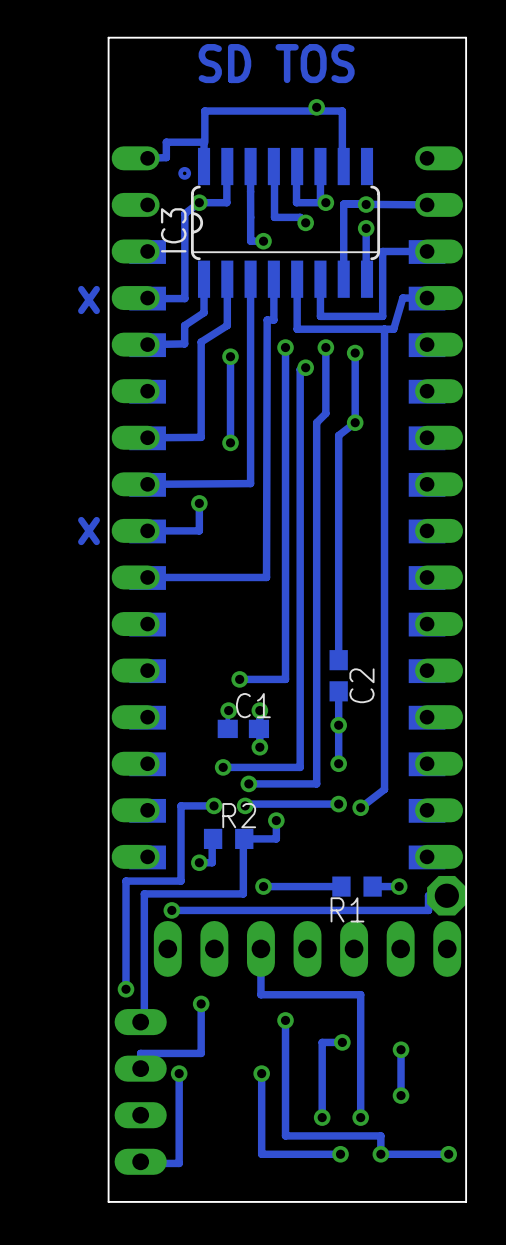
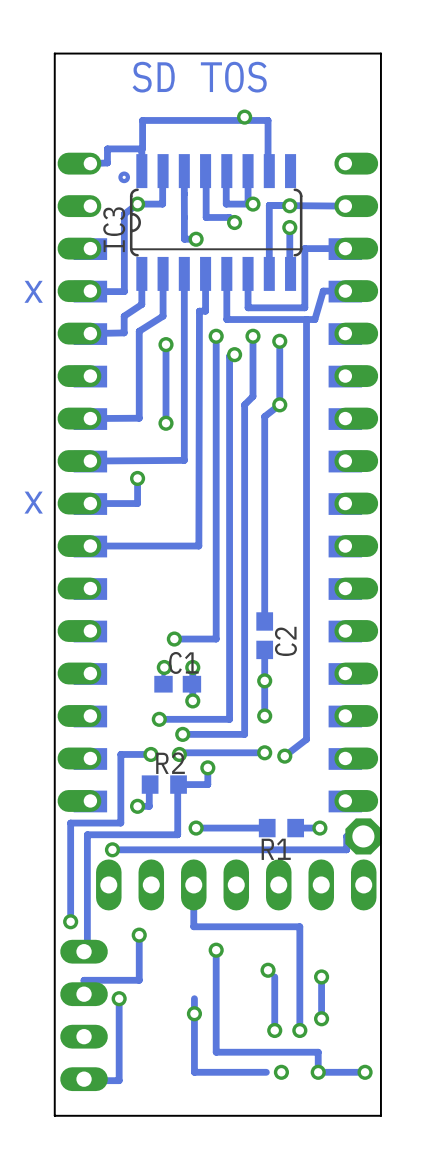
track: (360, 994) (360, 1117) -> (284, 926) (299, 926) (299, 1030)
track: (342, 1042) (322, 1042) (322, 1117) -> none
track: none -> (274, 976) (274, 1030)
via position: (261, 1073) -> (194, 1013)
via: none -> (274, 1030)
via: none -> (299, 1030)
via: (322, 1117) -> none
via: (360, 1117) -> none
track: (285, 1132) (285, 1135) (380, 1135) (380, 1154) (397, 1154) -> (216, 1052) (318, 1052) (318, 1072)
via position: (340, 1154) -> (281, 1072)
via position: (380, 1154) -> (318, 1072)

